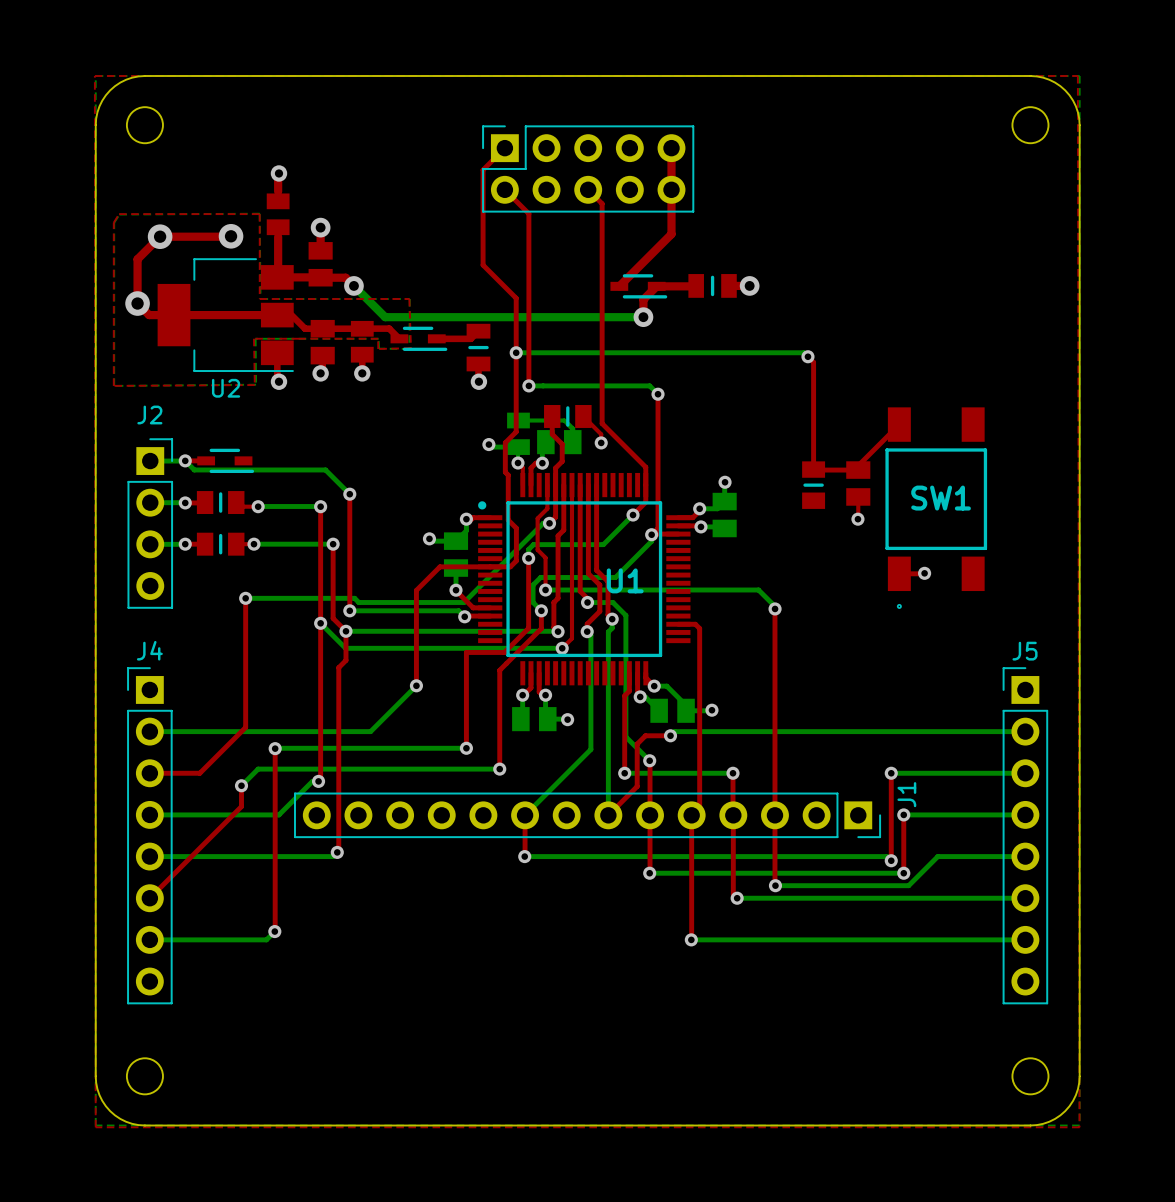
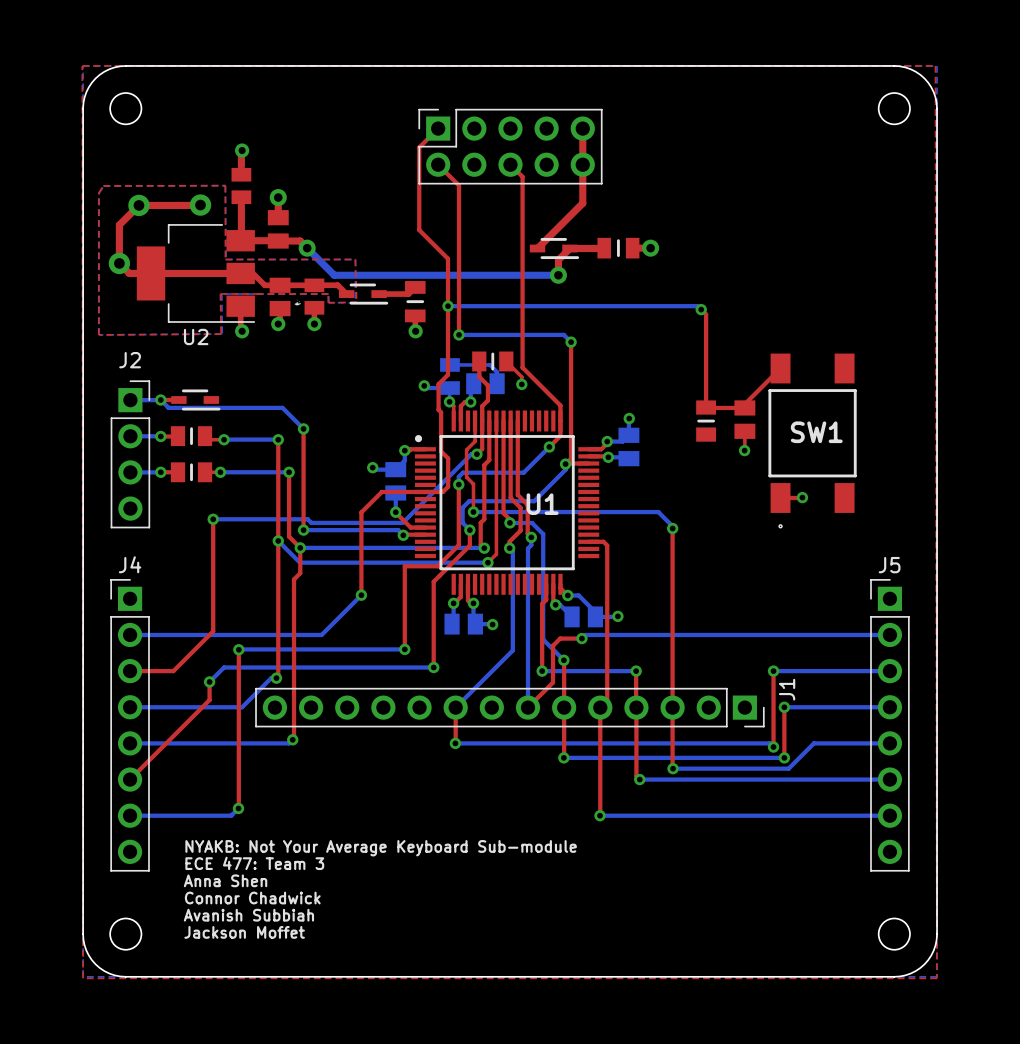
drawing: none -> [294, 298, 302, 306]
text: none -> NYAKB: Not Your Average Keyboard Sub-module (381, 848)
text: none -> ECE 477: Team 3 (254, 863)
text: none -> Anna Shen (225, 880)
text: none -> Connor Chadwick (252, 898)
text: none -> Avanish Subbiah (248, 915)
text: none -> Jackson Moffet (244, 932)

